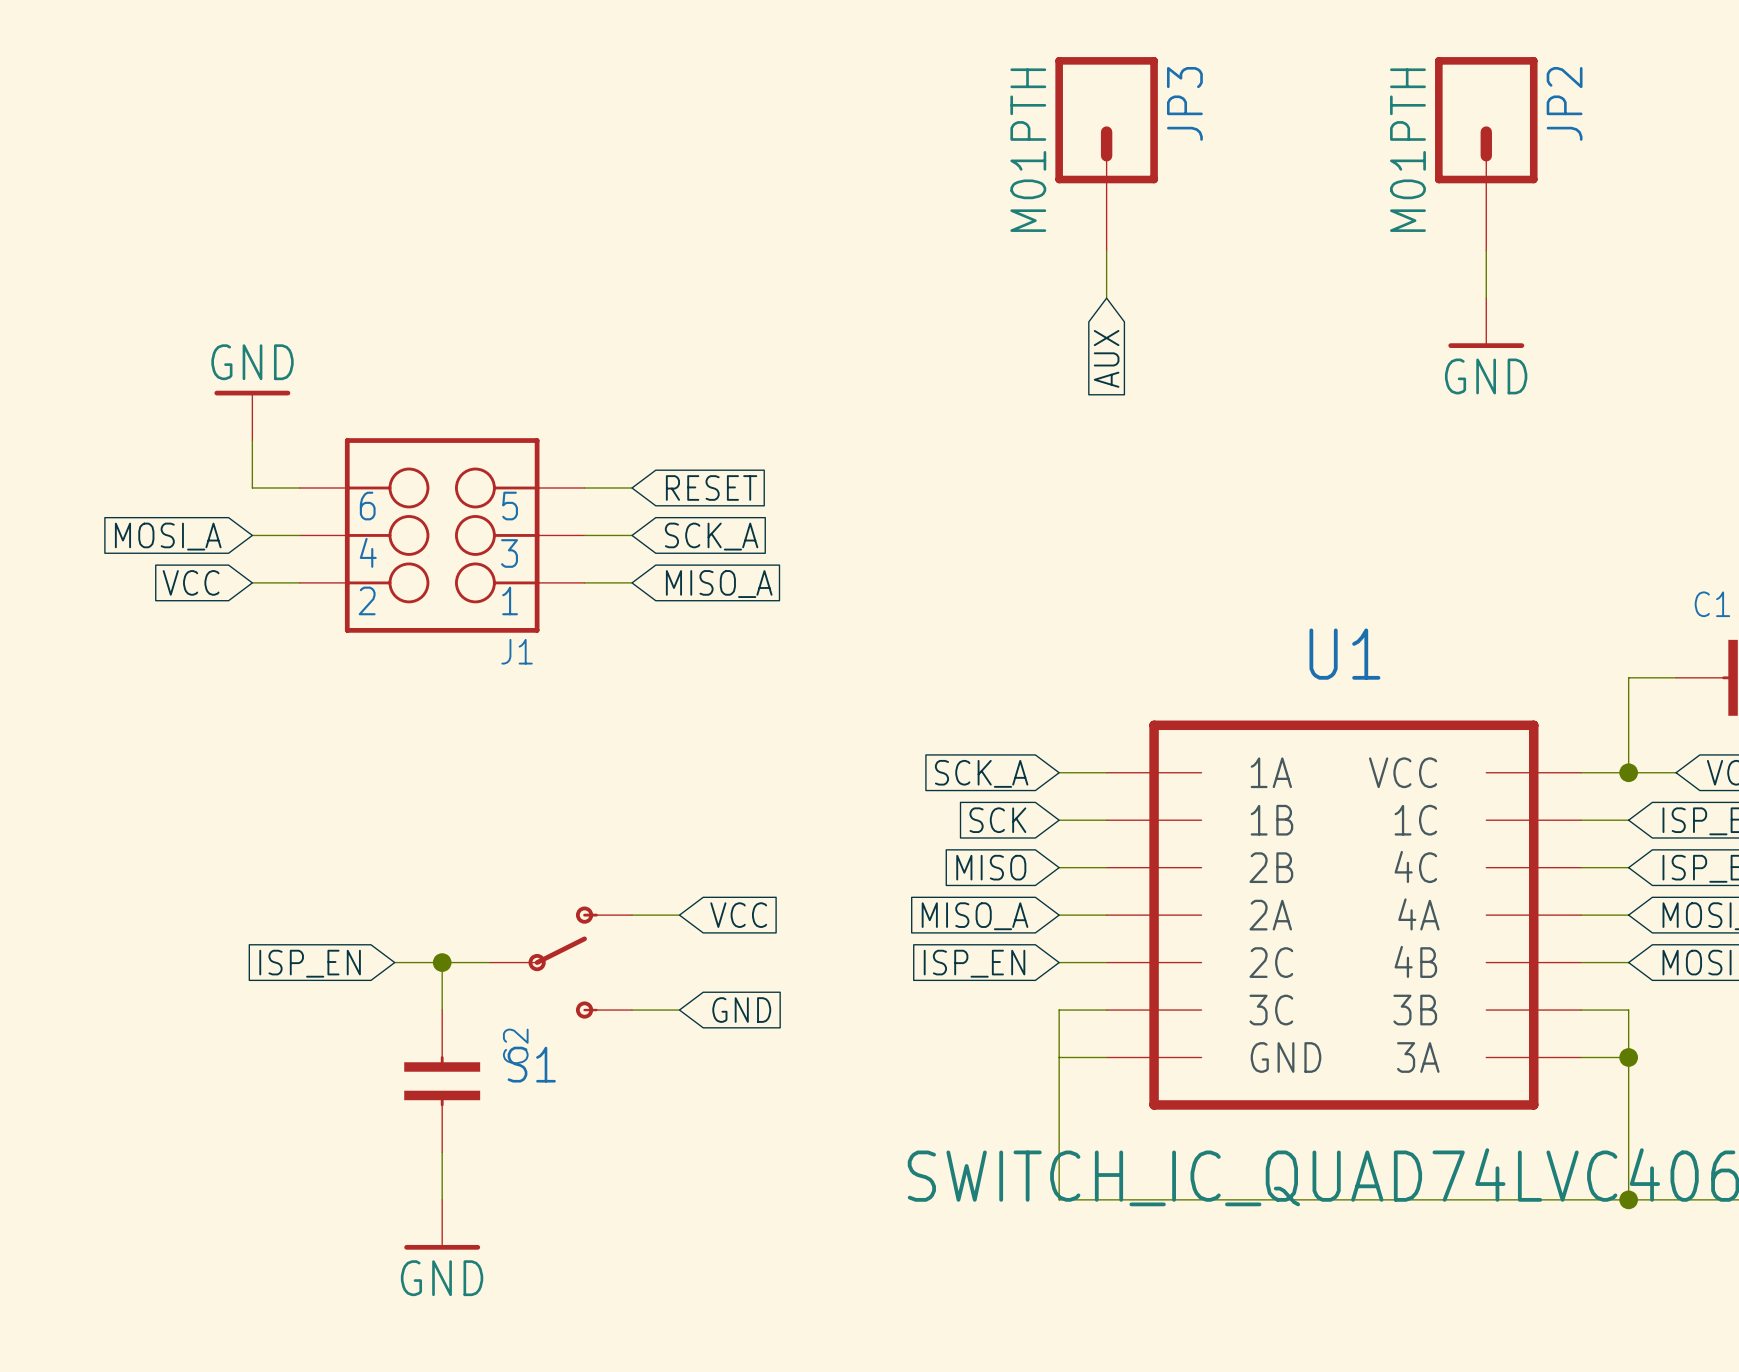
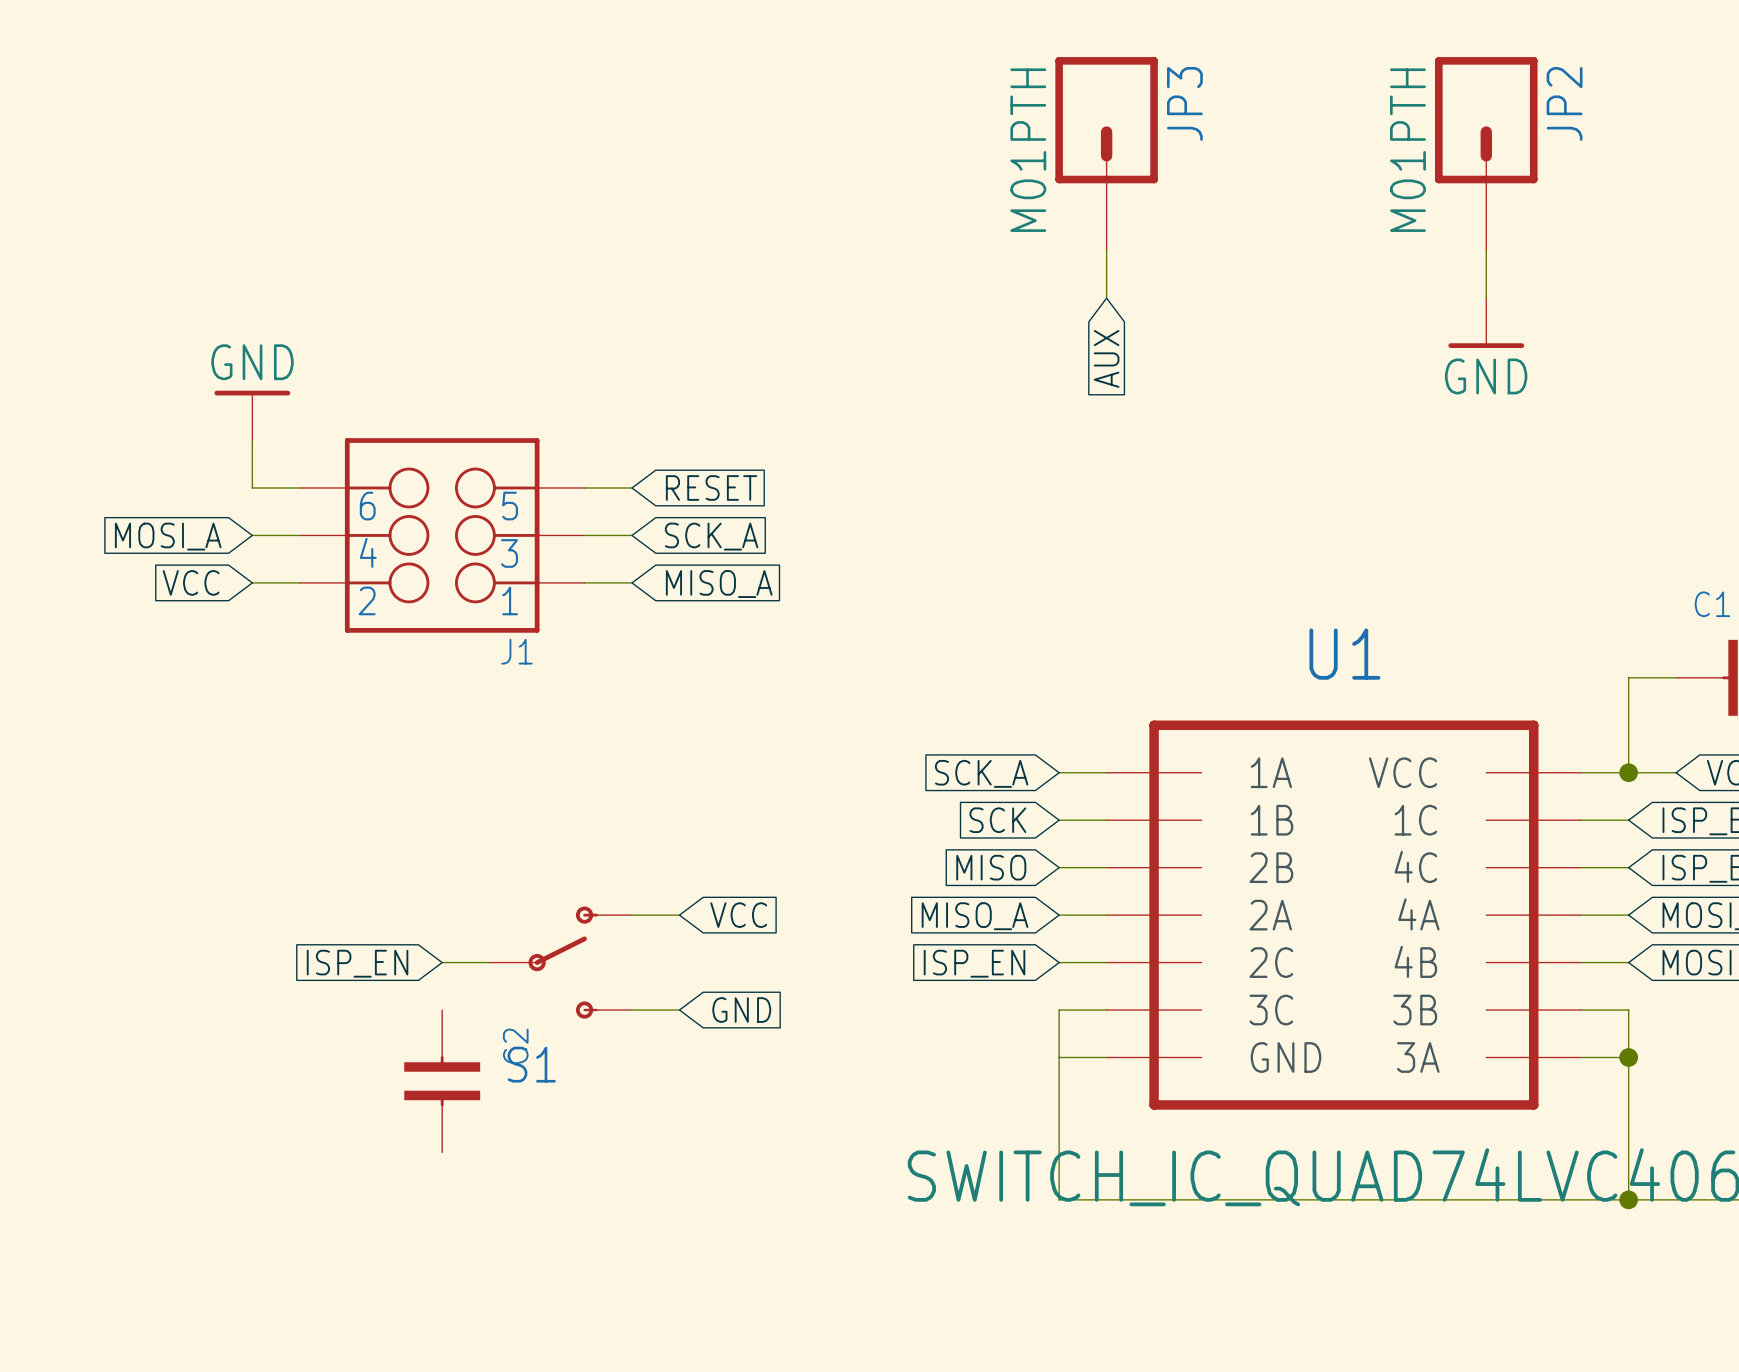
wire: (394, 962) (442, 962) (442, 1010) -> none
junction: (442, 962) -> none
global label position: ISP_EN (310, 963) -> ISP_EN (357, 963)
wire: (442, 1152) (442, 1199) -> none
power symbol: GND (442, 1224) -> none

